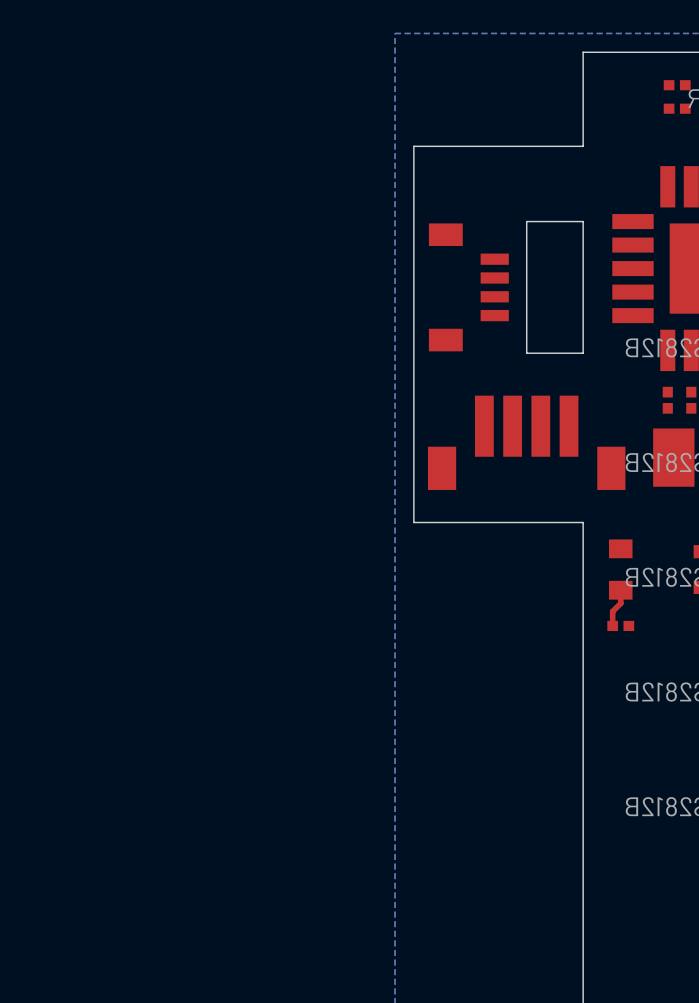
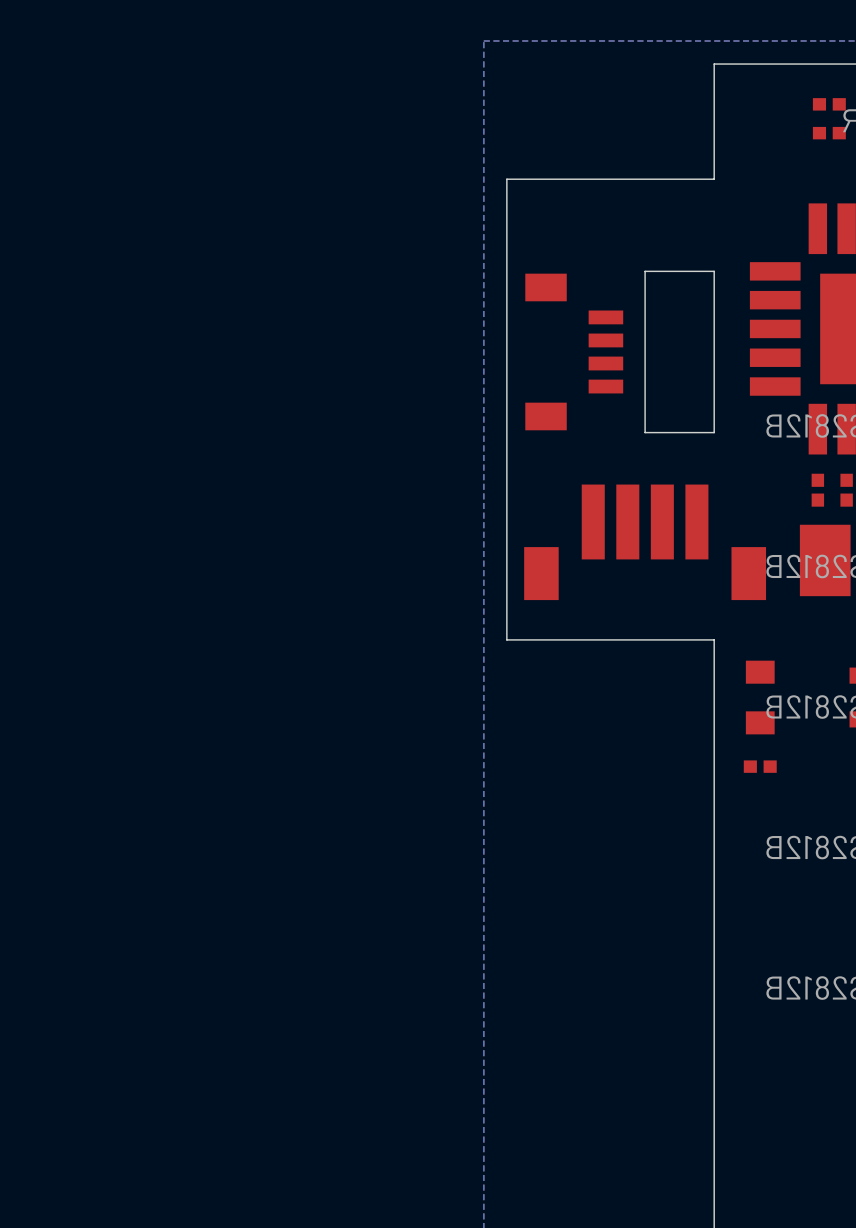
top track: (620, 590) (620, 603) (612, 611) (612, 625) -> none

